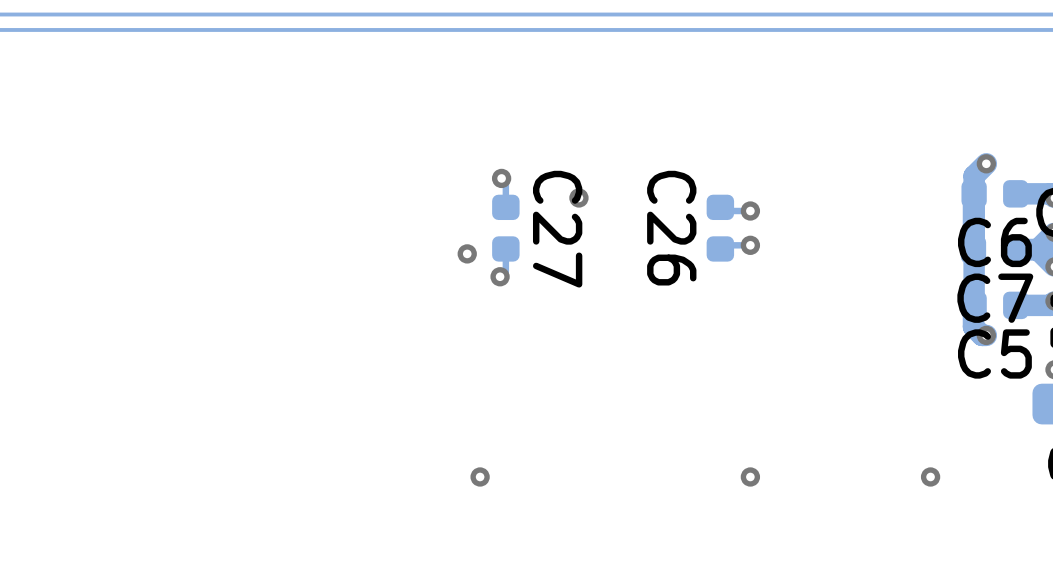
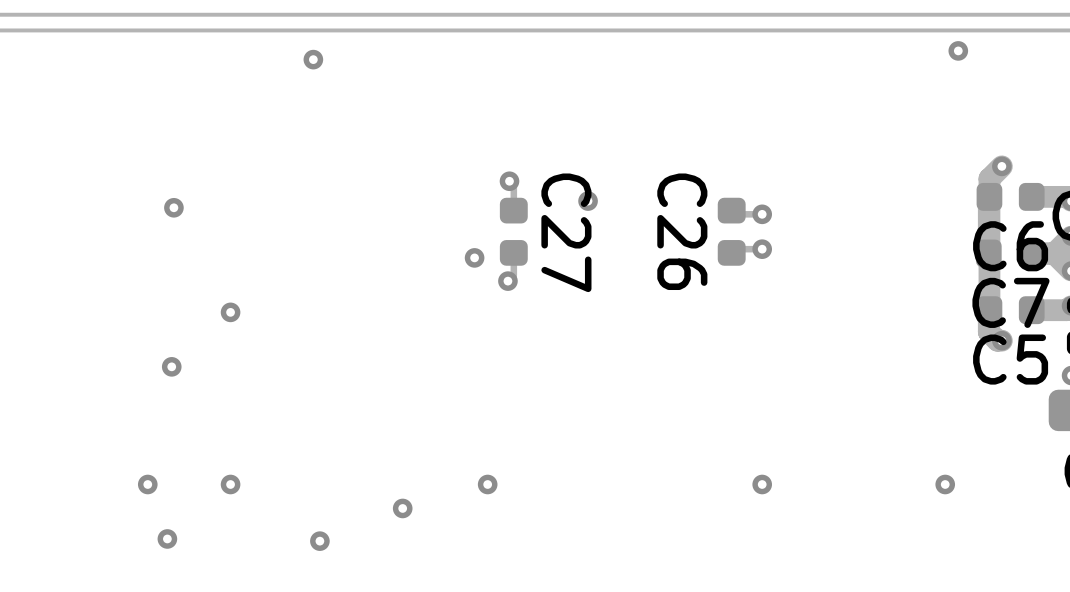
via: none -> (958, 50)
via: none -> (313, 59)
via: none -> (173, 207)
via: none -> (230, 312)
via: none -> (171, 366)
via: none -> (147, 484)
via: none -> (230, 484)
via: none -> (402, 508)
via: none -> (167, 538)
via: none -> (319, 541)

